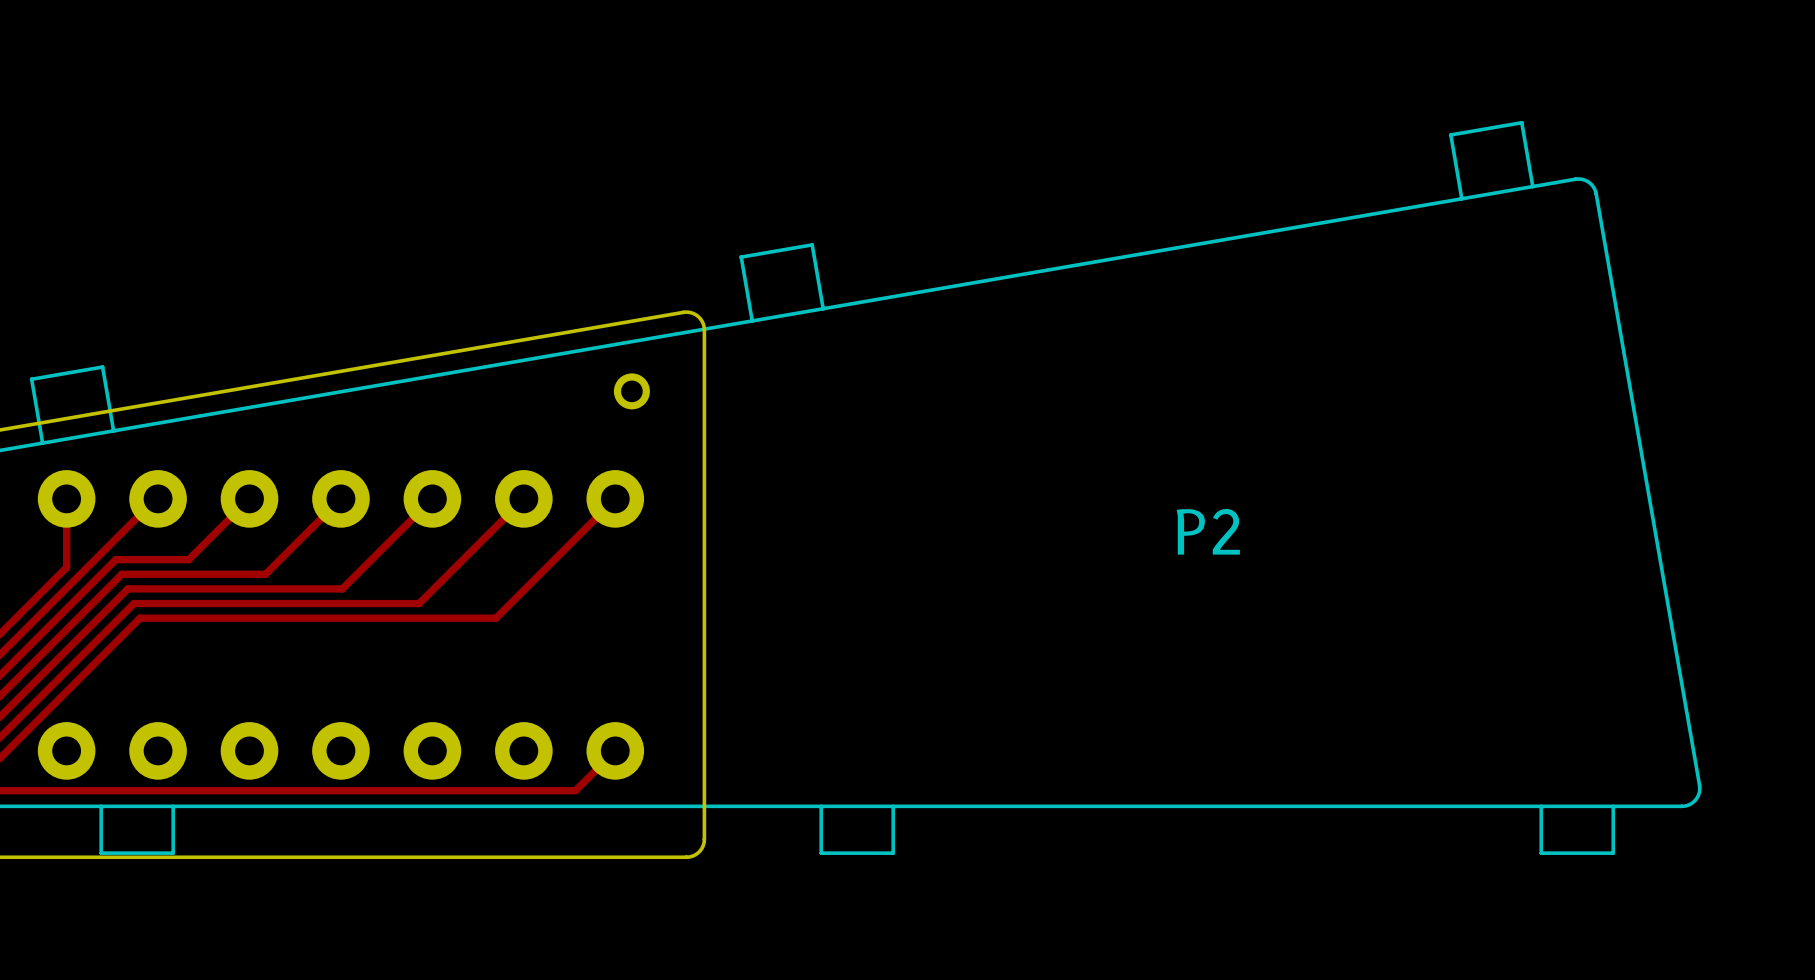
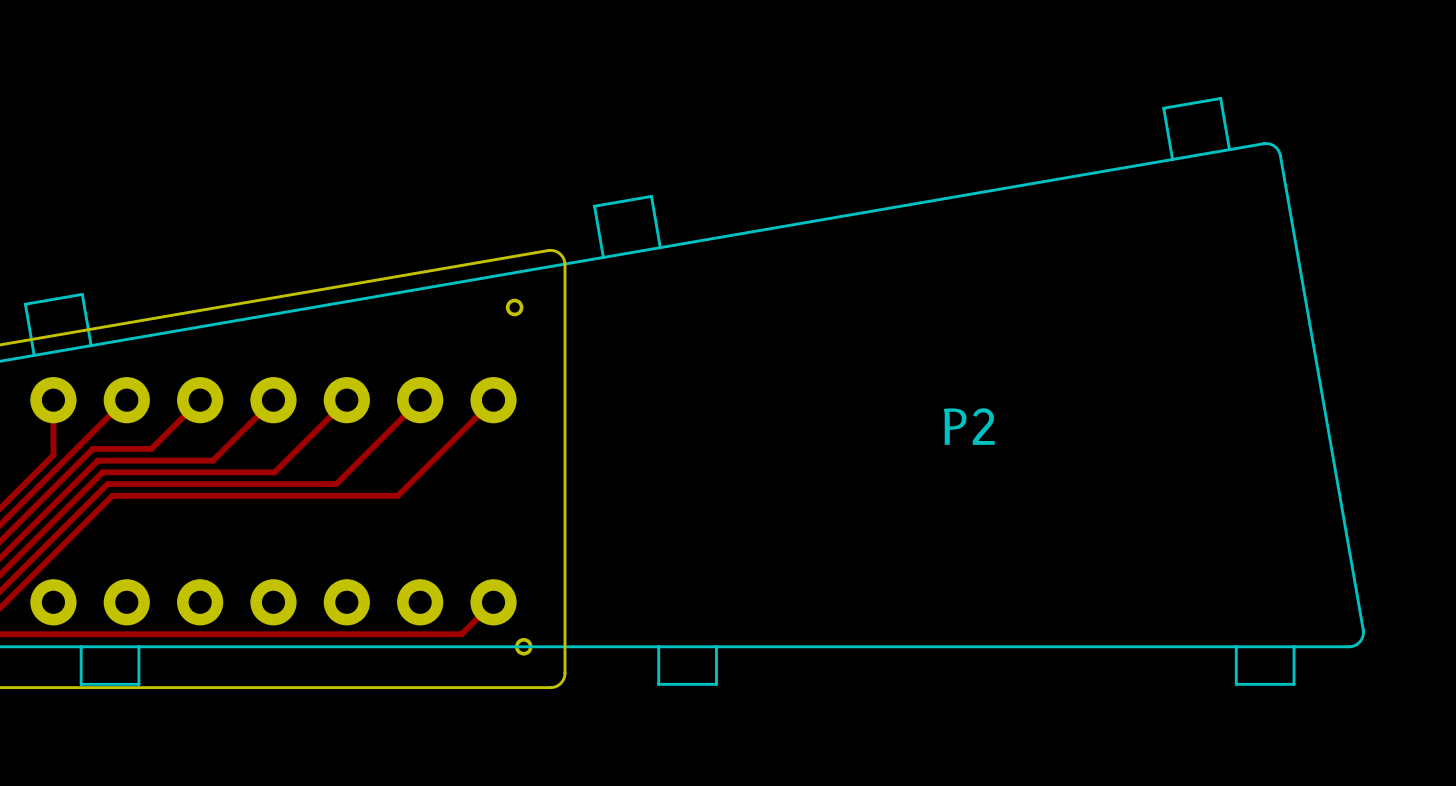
part footprint: [613, 373, 650, 410] -> [505, 298, 524, 317]
part: none -> (523, 646)

